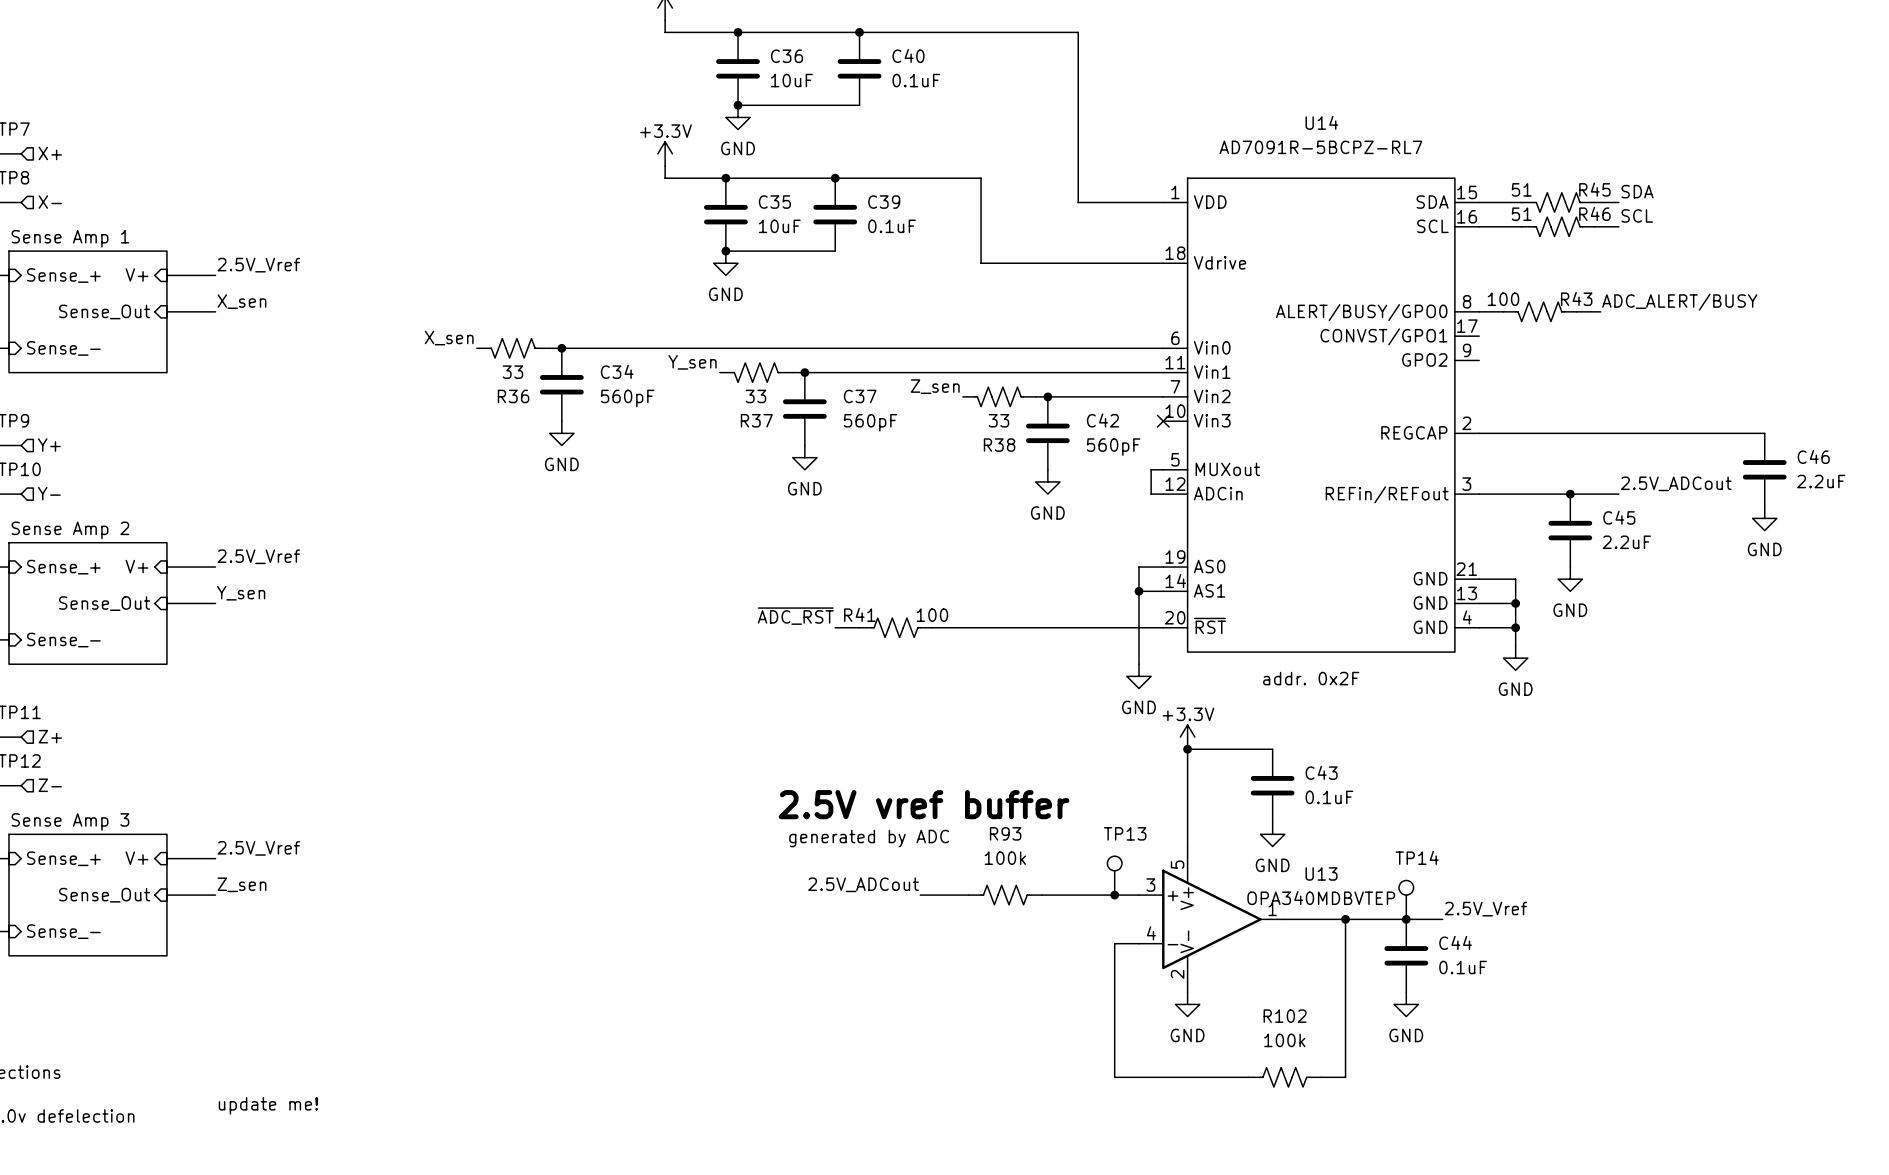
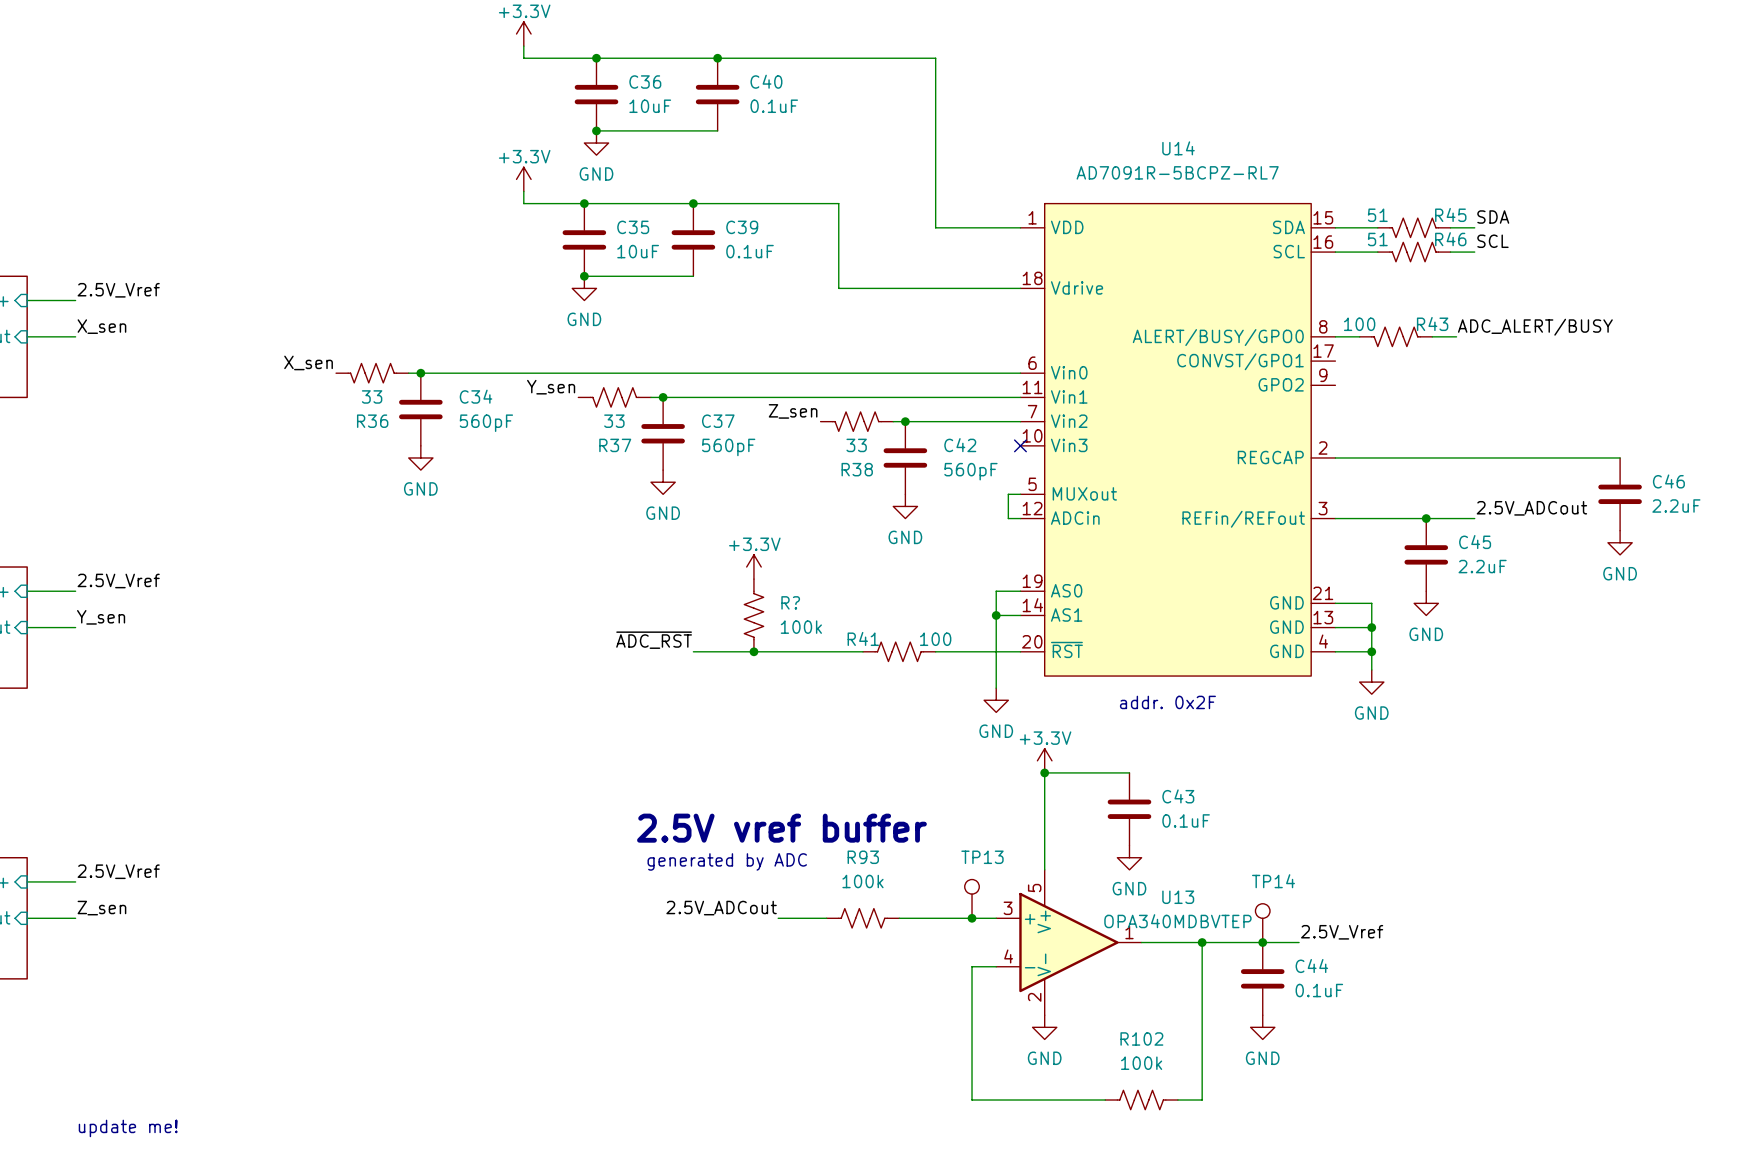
power symbol: none -> +3.3V (753, 567)
R?: none -> 100k (753, 615)
R41 position: (895, 627) -> (899, 651)
junction: none -> (753, 651)

